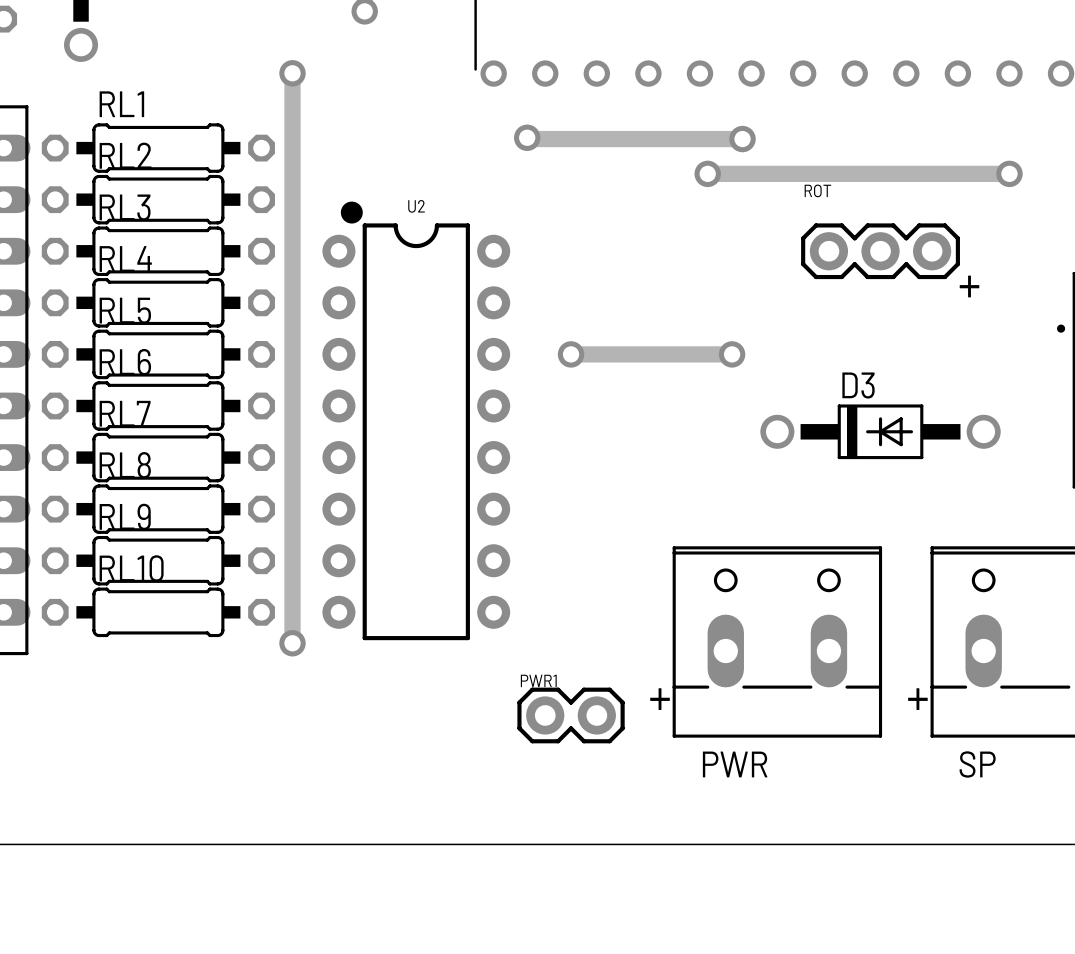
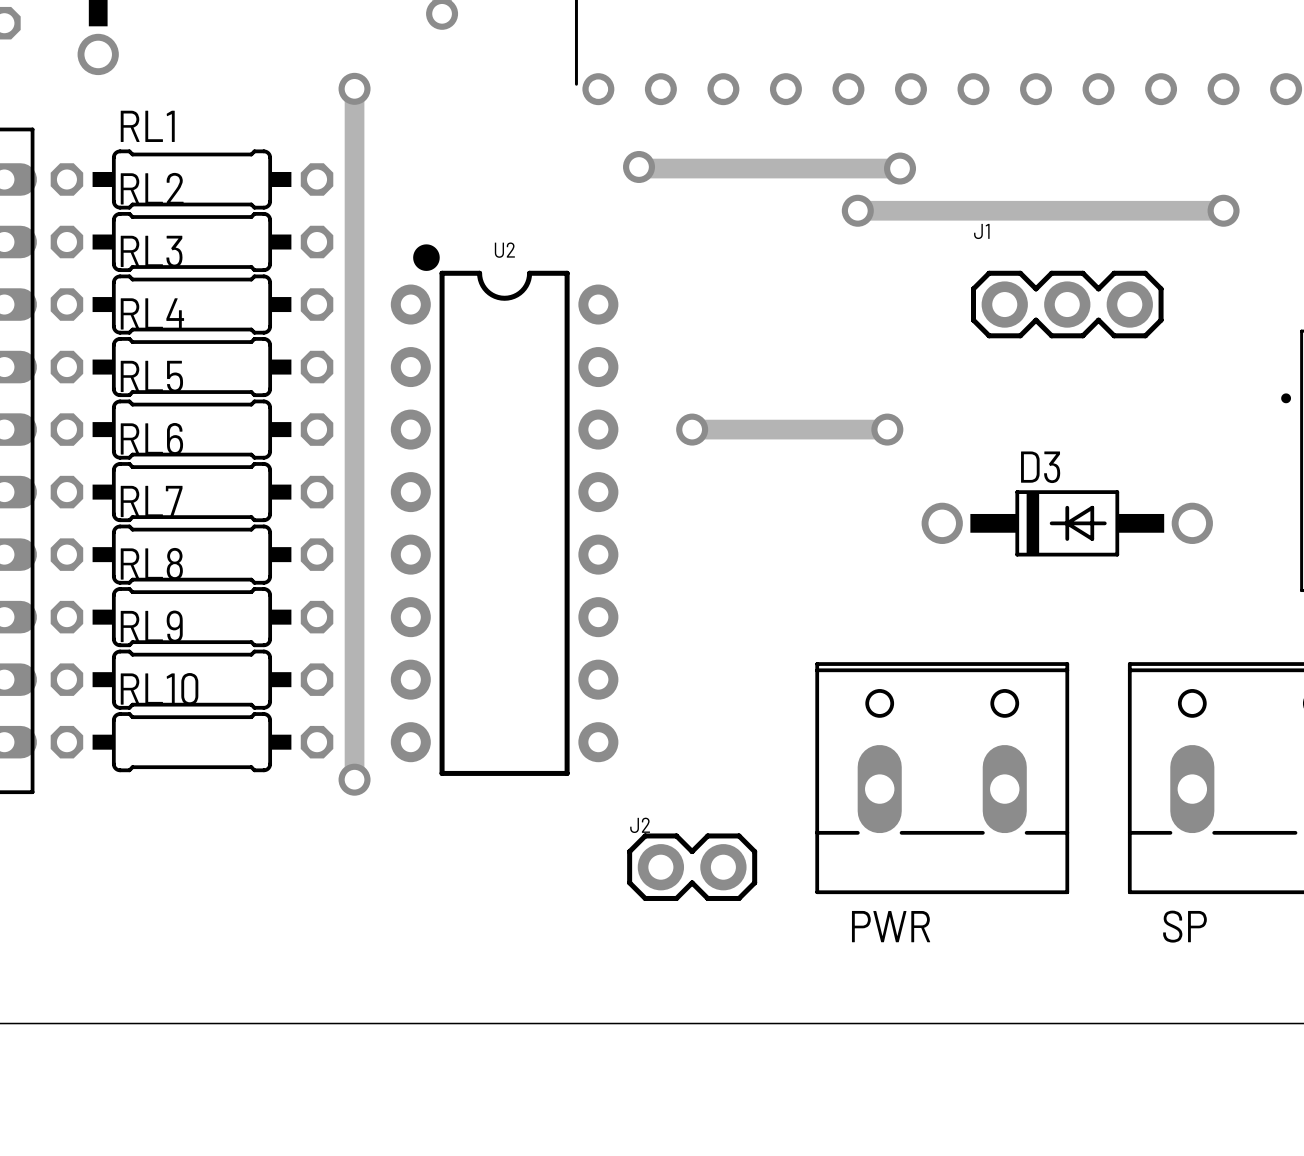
ROT name: ROT (817, 190) -> J1 (981, 231)
text: + (969, 286) -> none
PWR1 name: PWR1 (538, 680) -> J2 (640, 825)
text: + (660, 699) -> none
text: + (917, 699) -> none

